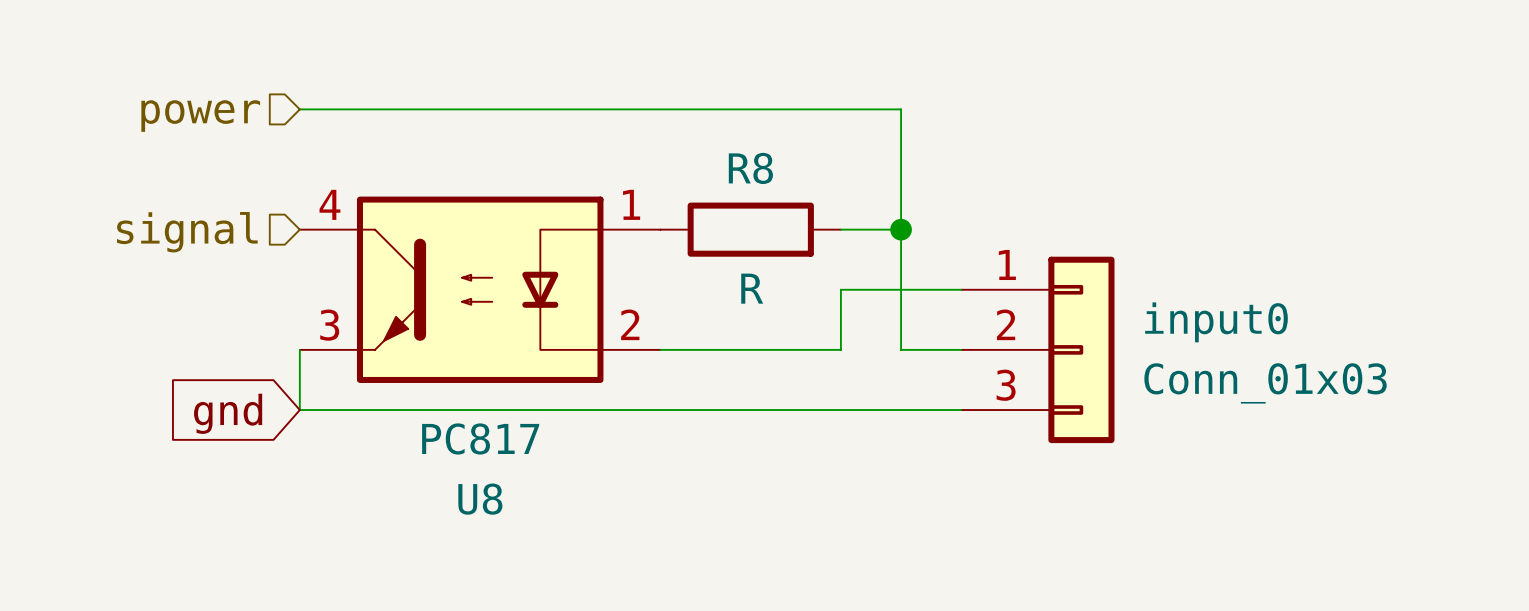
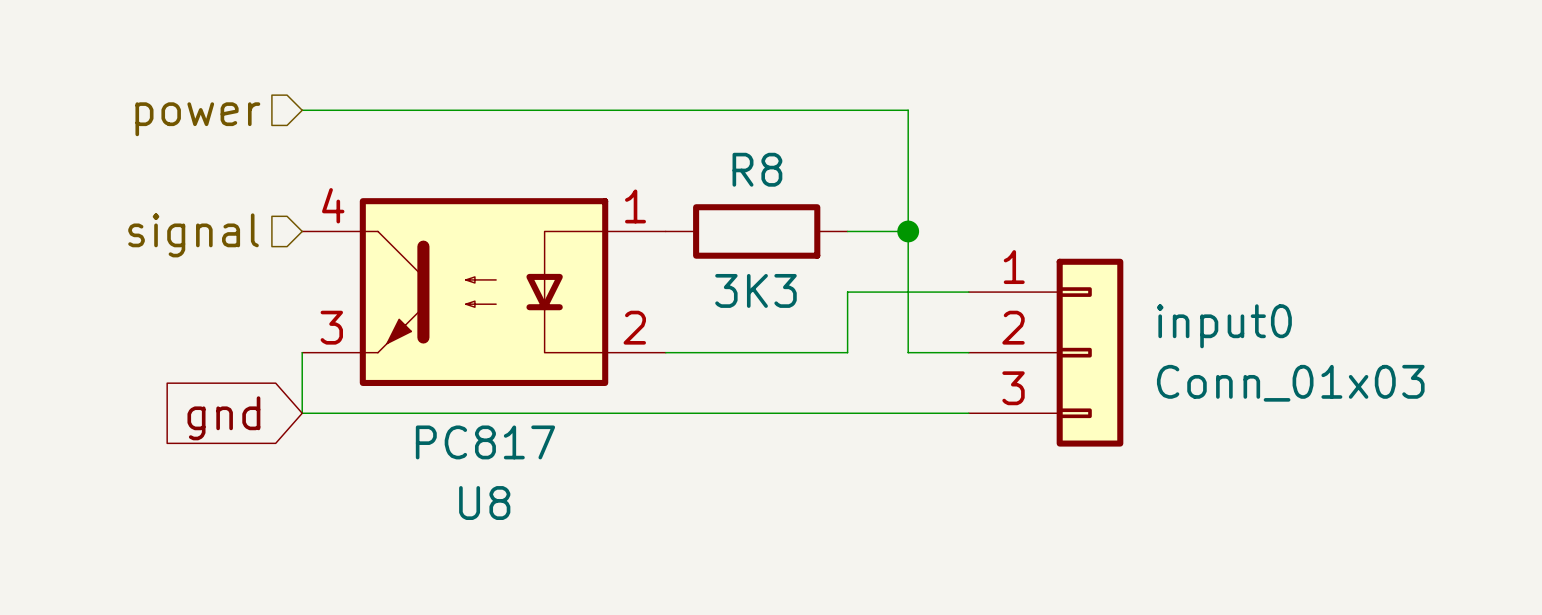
R8 value: R (752, 288) -> 3K3 (755, 290)

